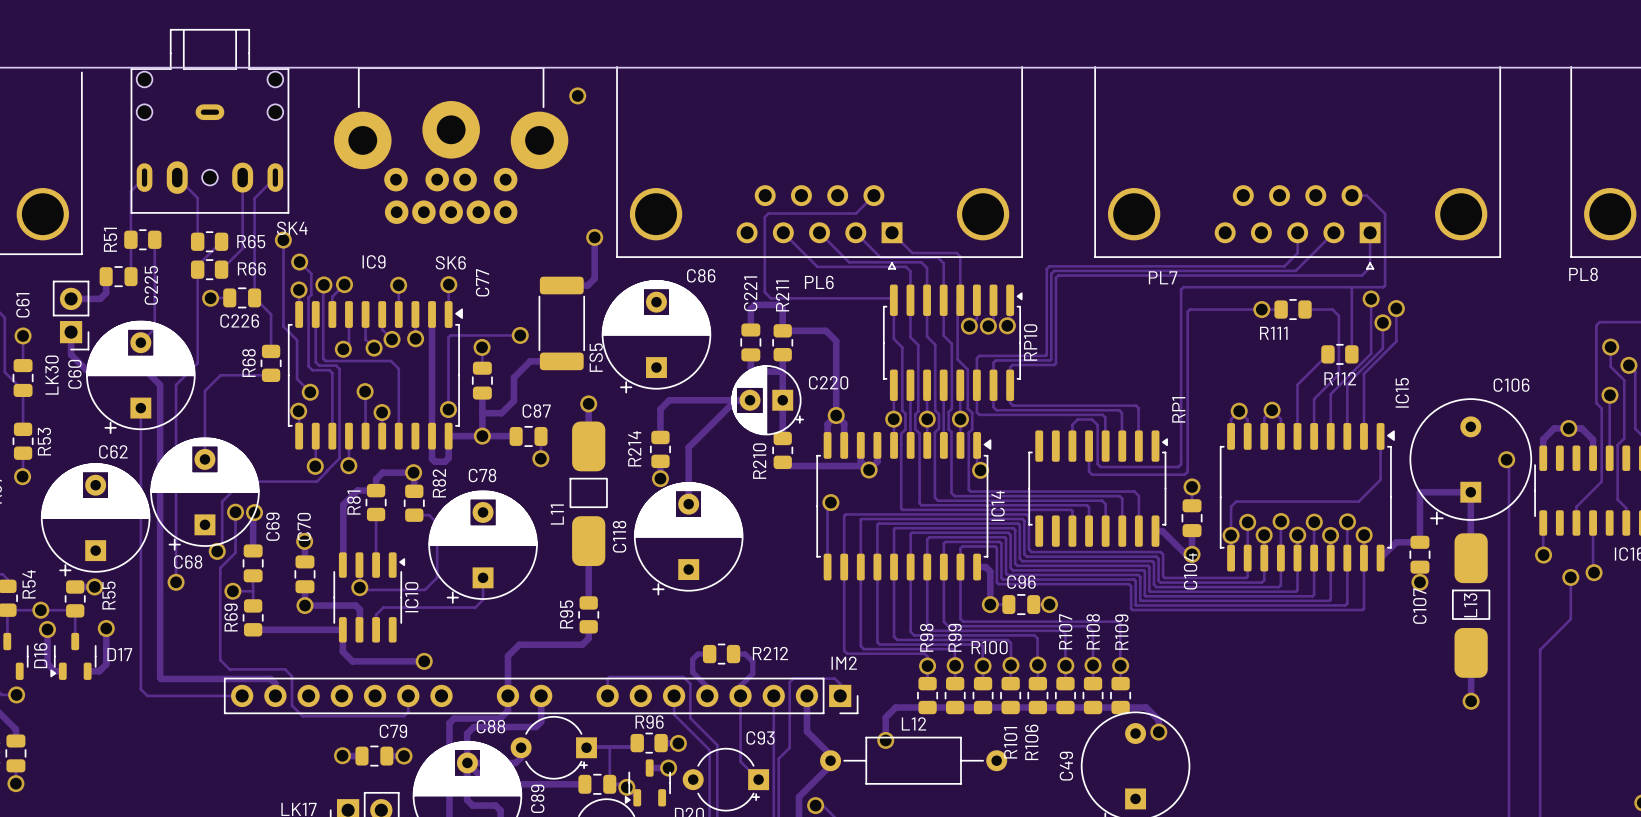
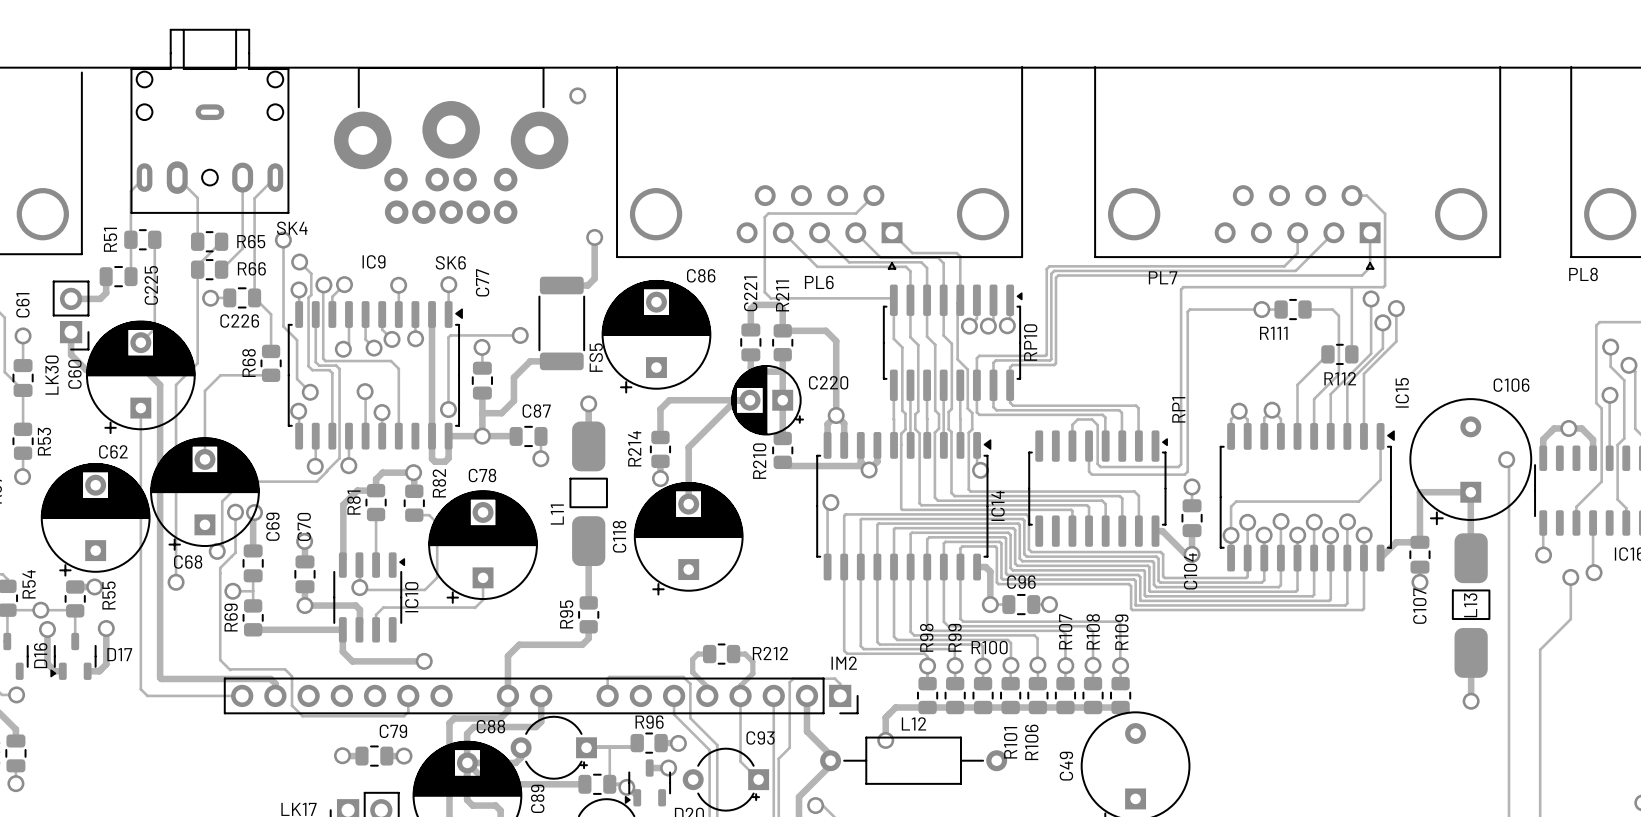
via: (893, 419) -> none
via: (927, 419) -> none
via: (960, 419) -> none
track: (1120, 707) (1146, 707) (1158, 720) (1158, 732) -> none
via: (1158, 732) -> none

